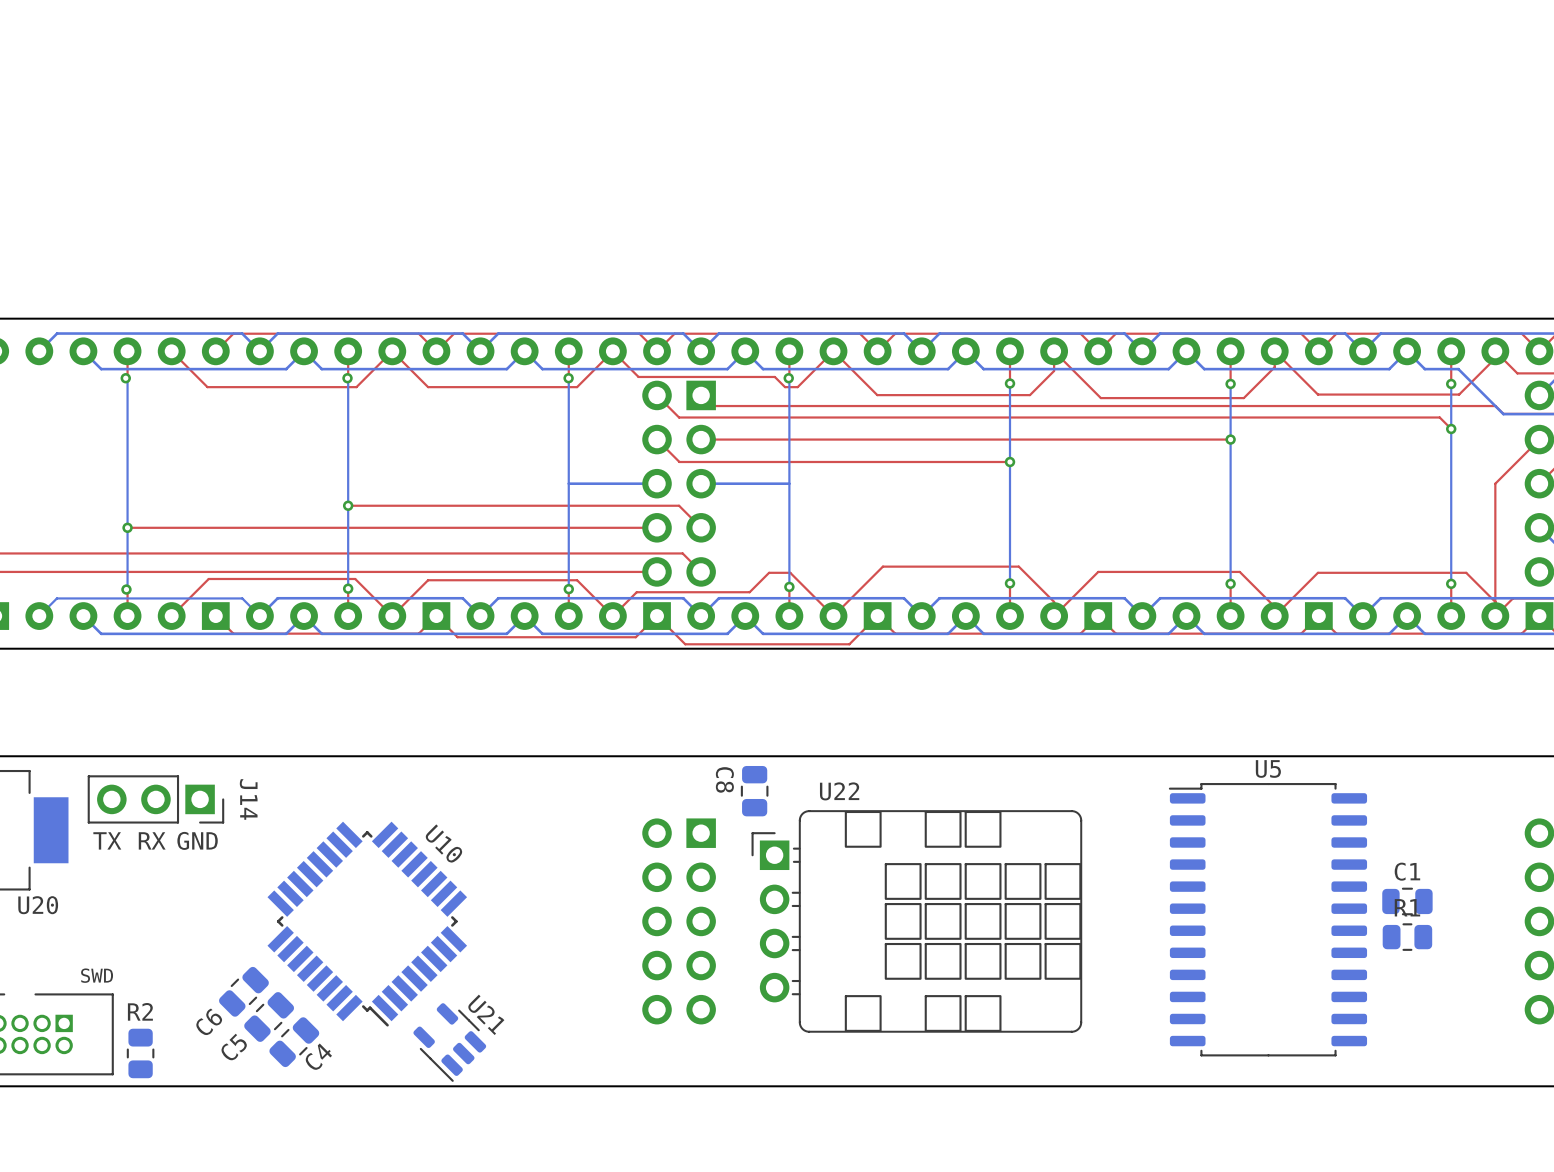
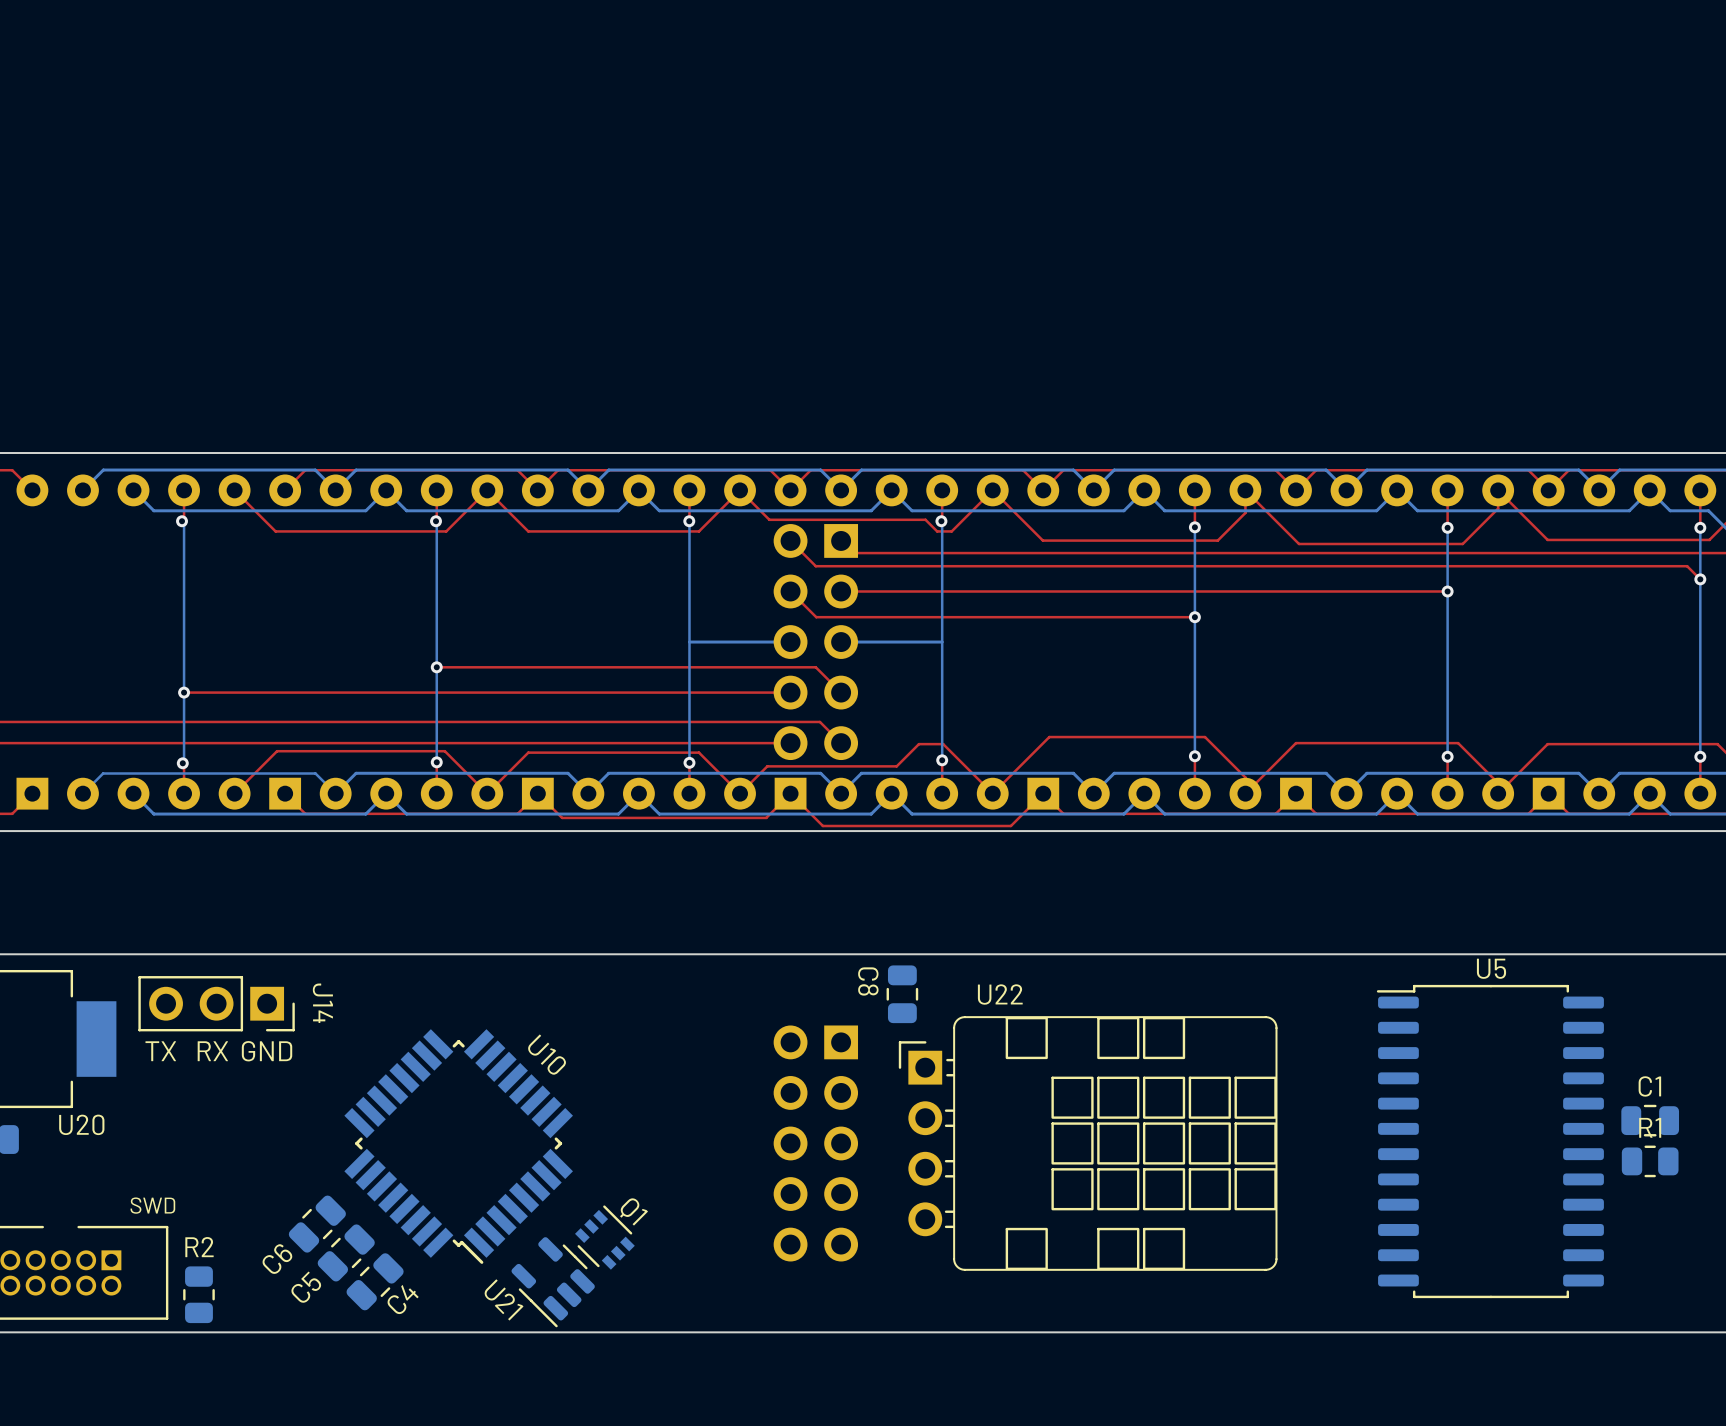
Q1: none -> (604, 1237)
U21 name position: U21 (486, 1014) -> U21 (503, 1299)

